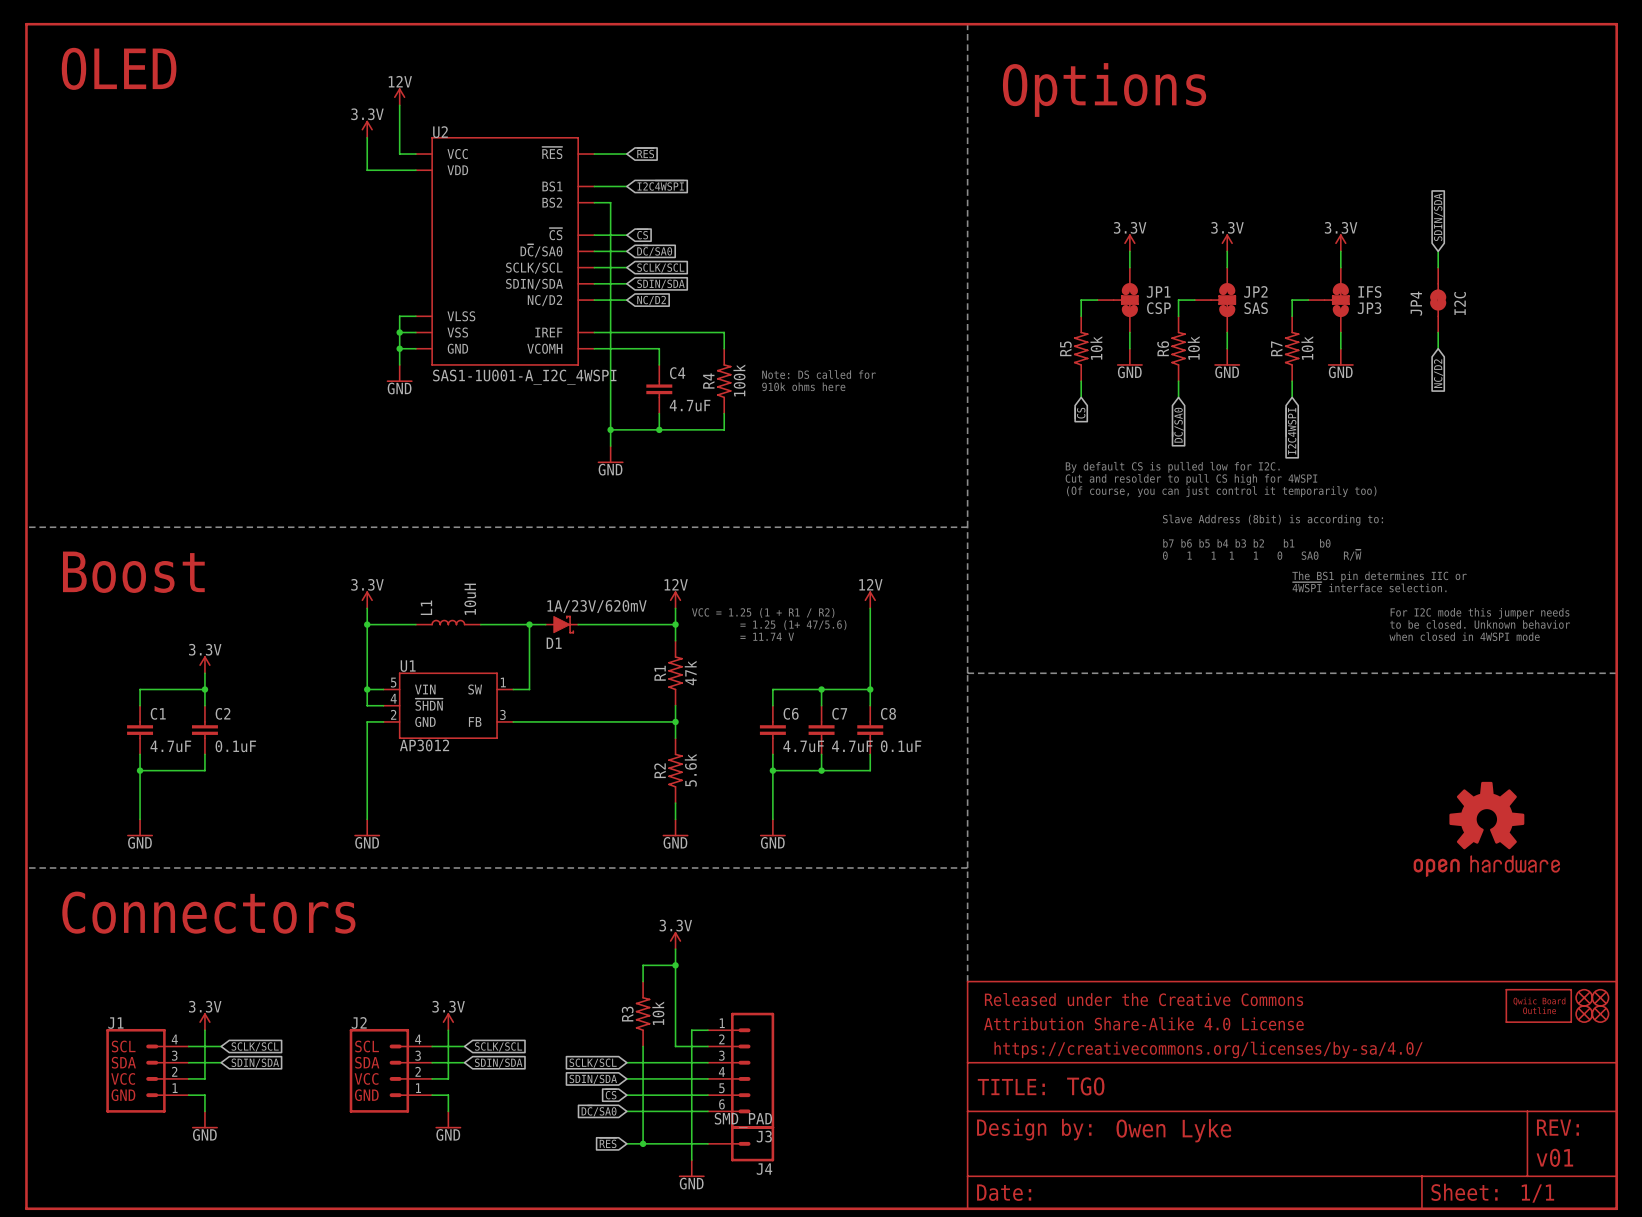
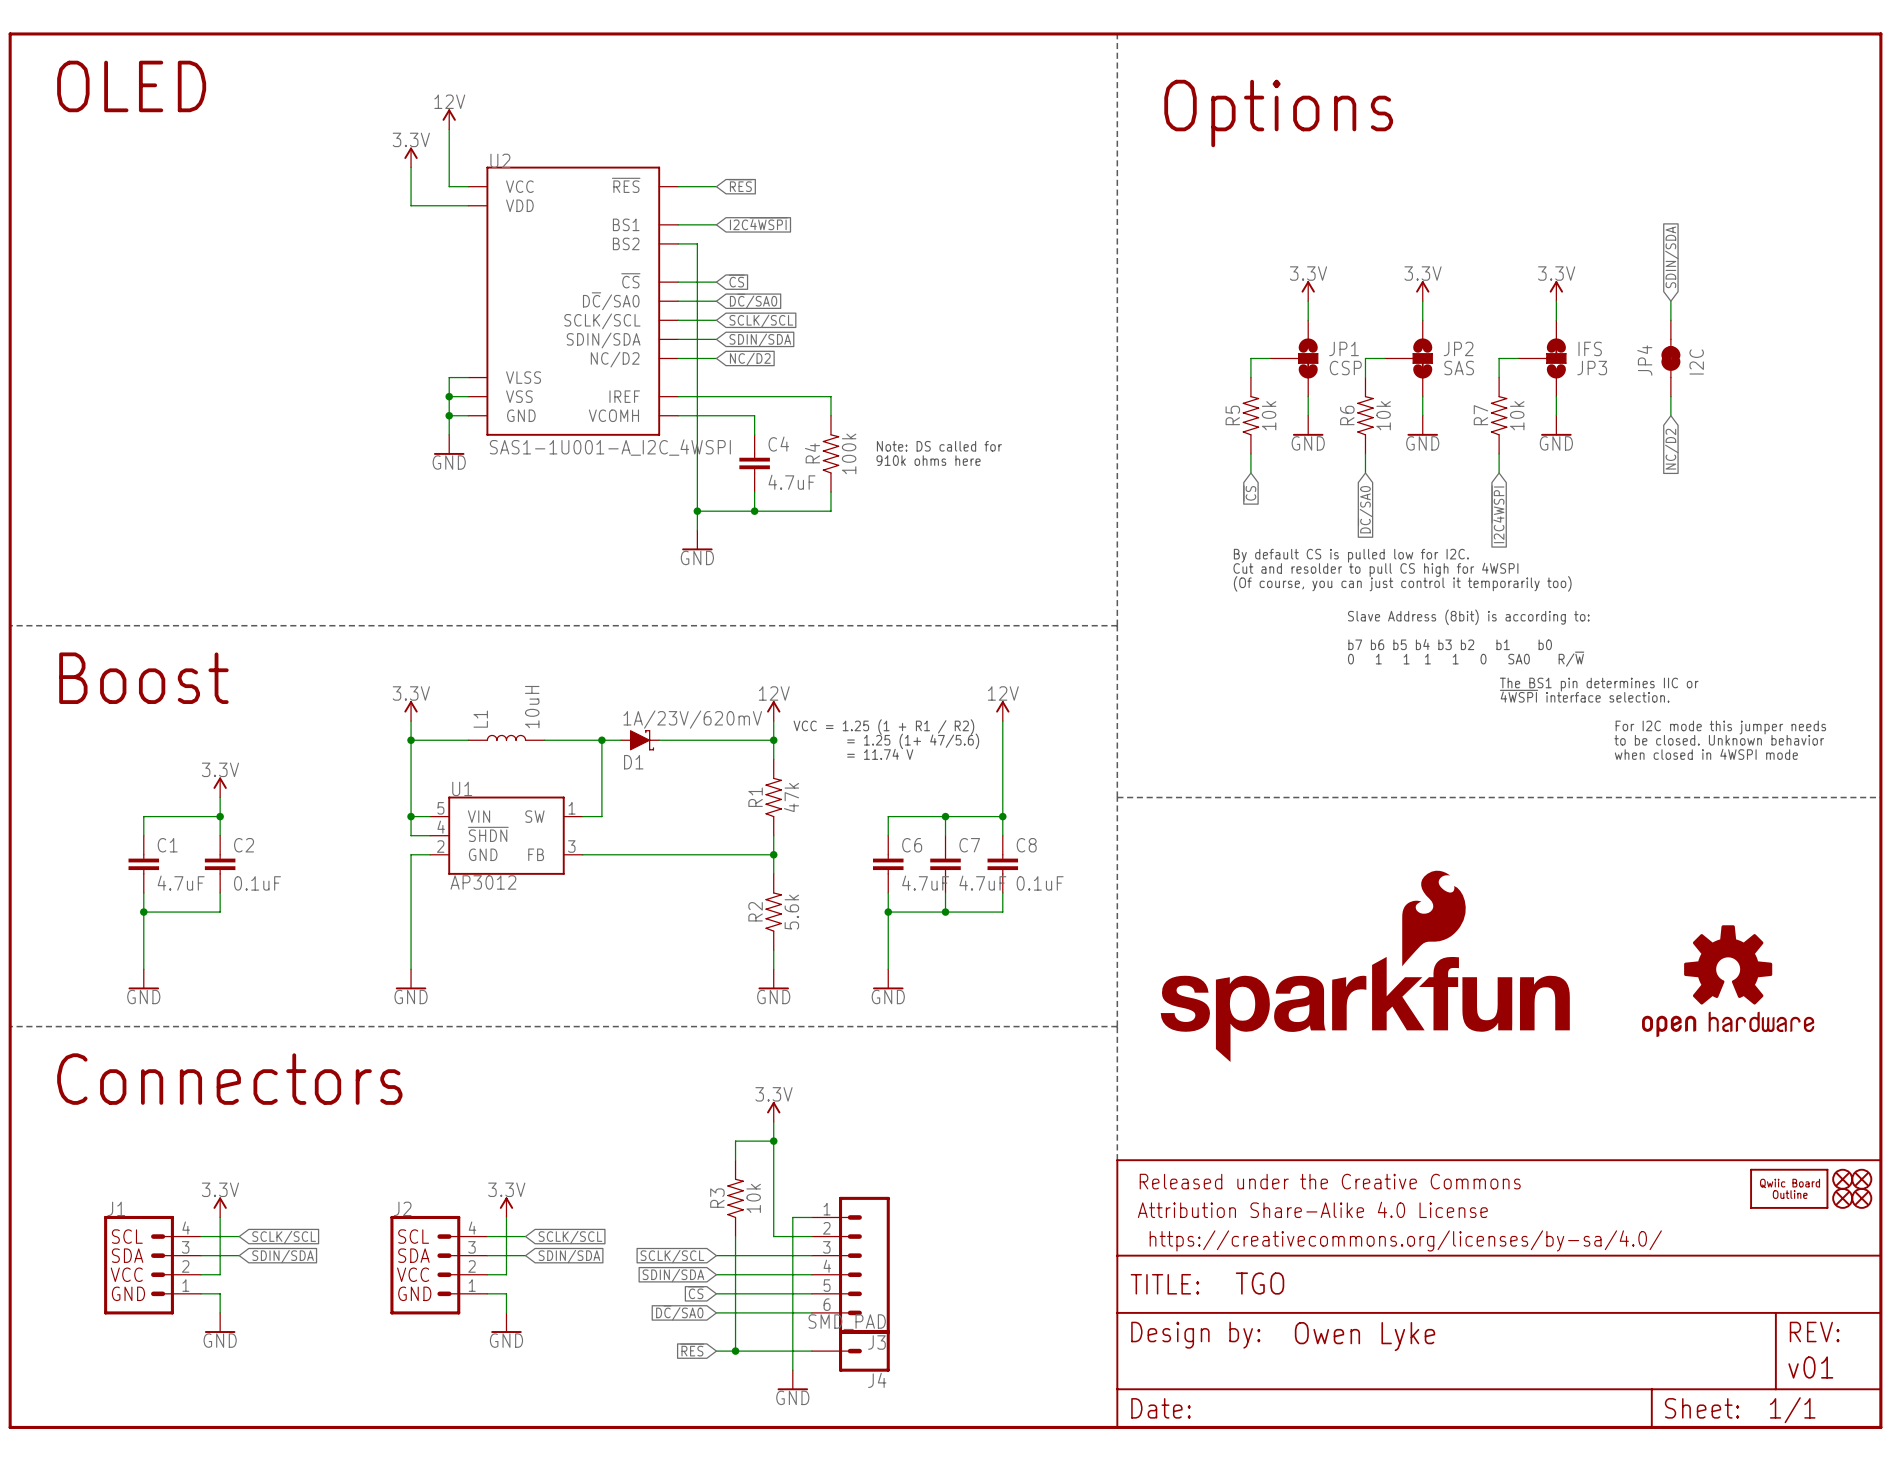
part: none -> (1365, 966)

